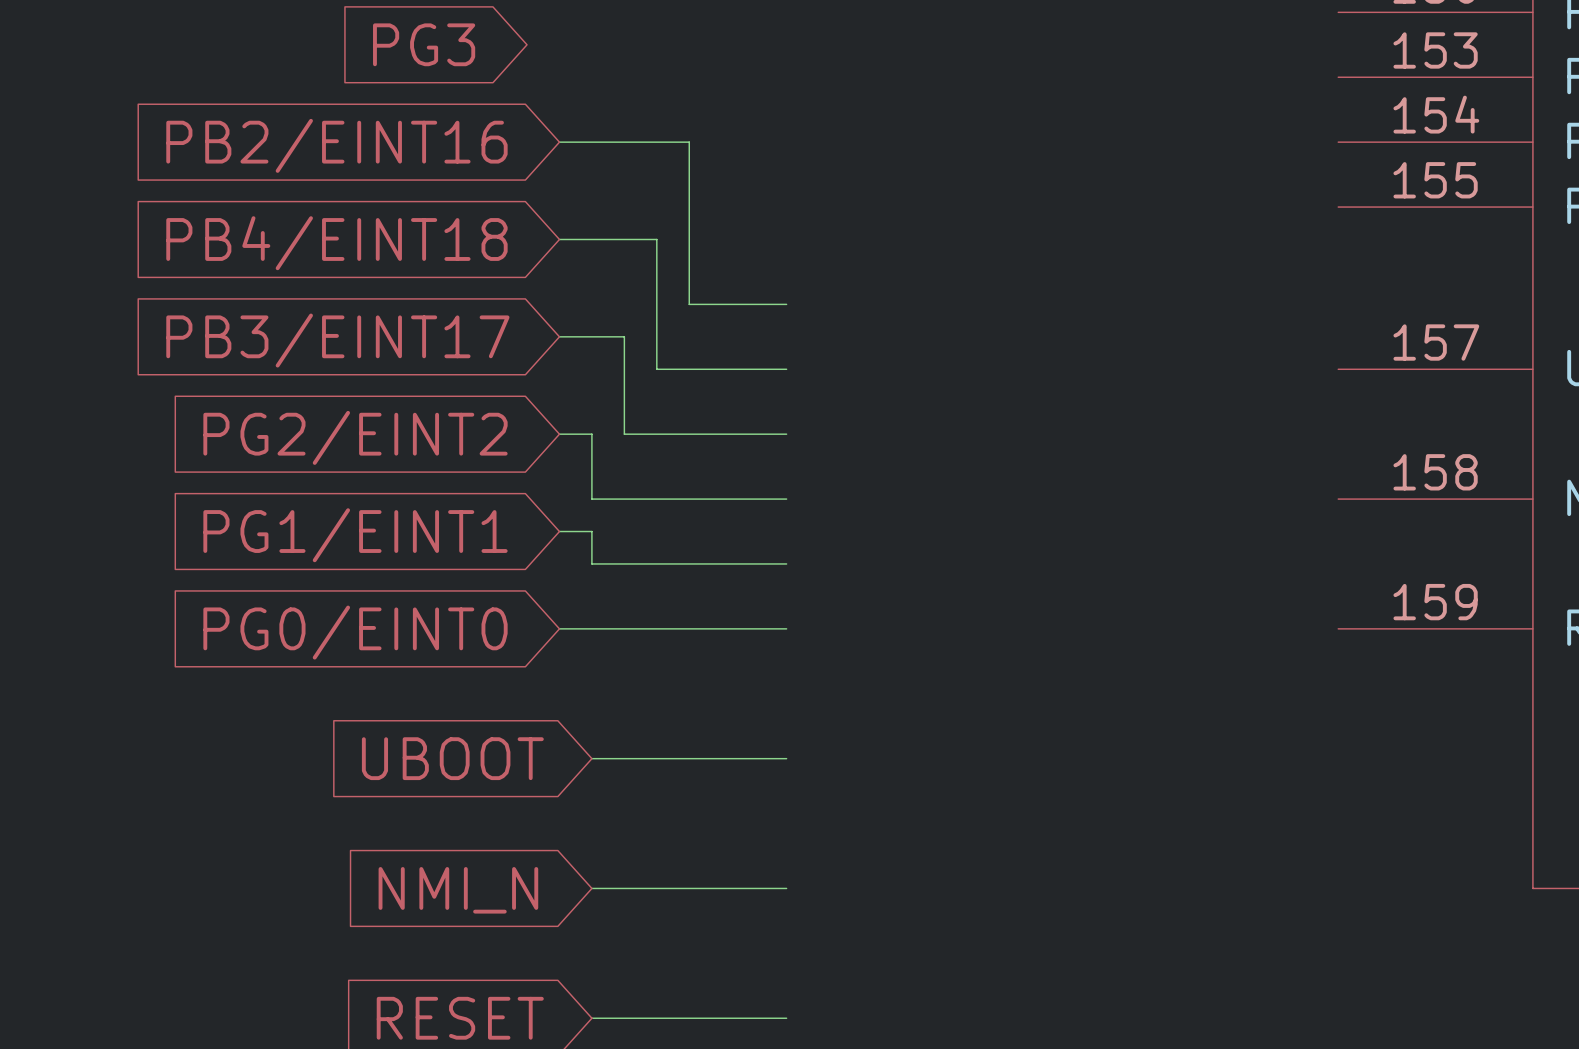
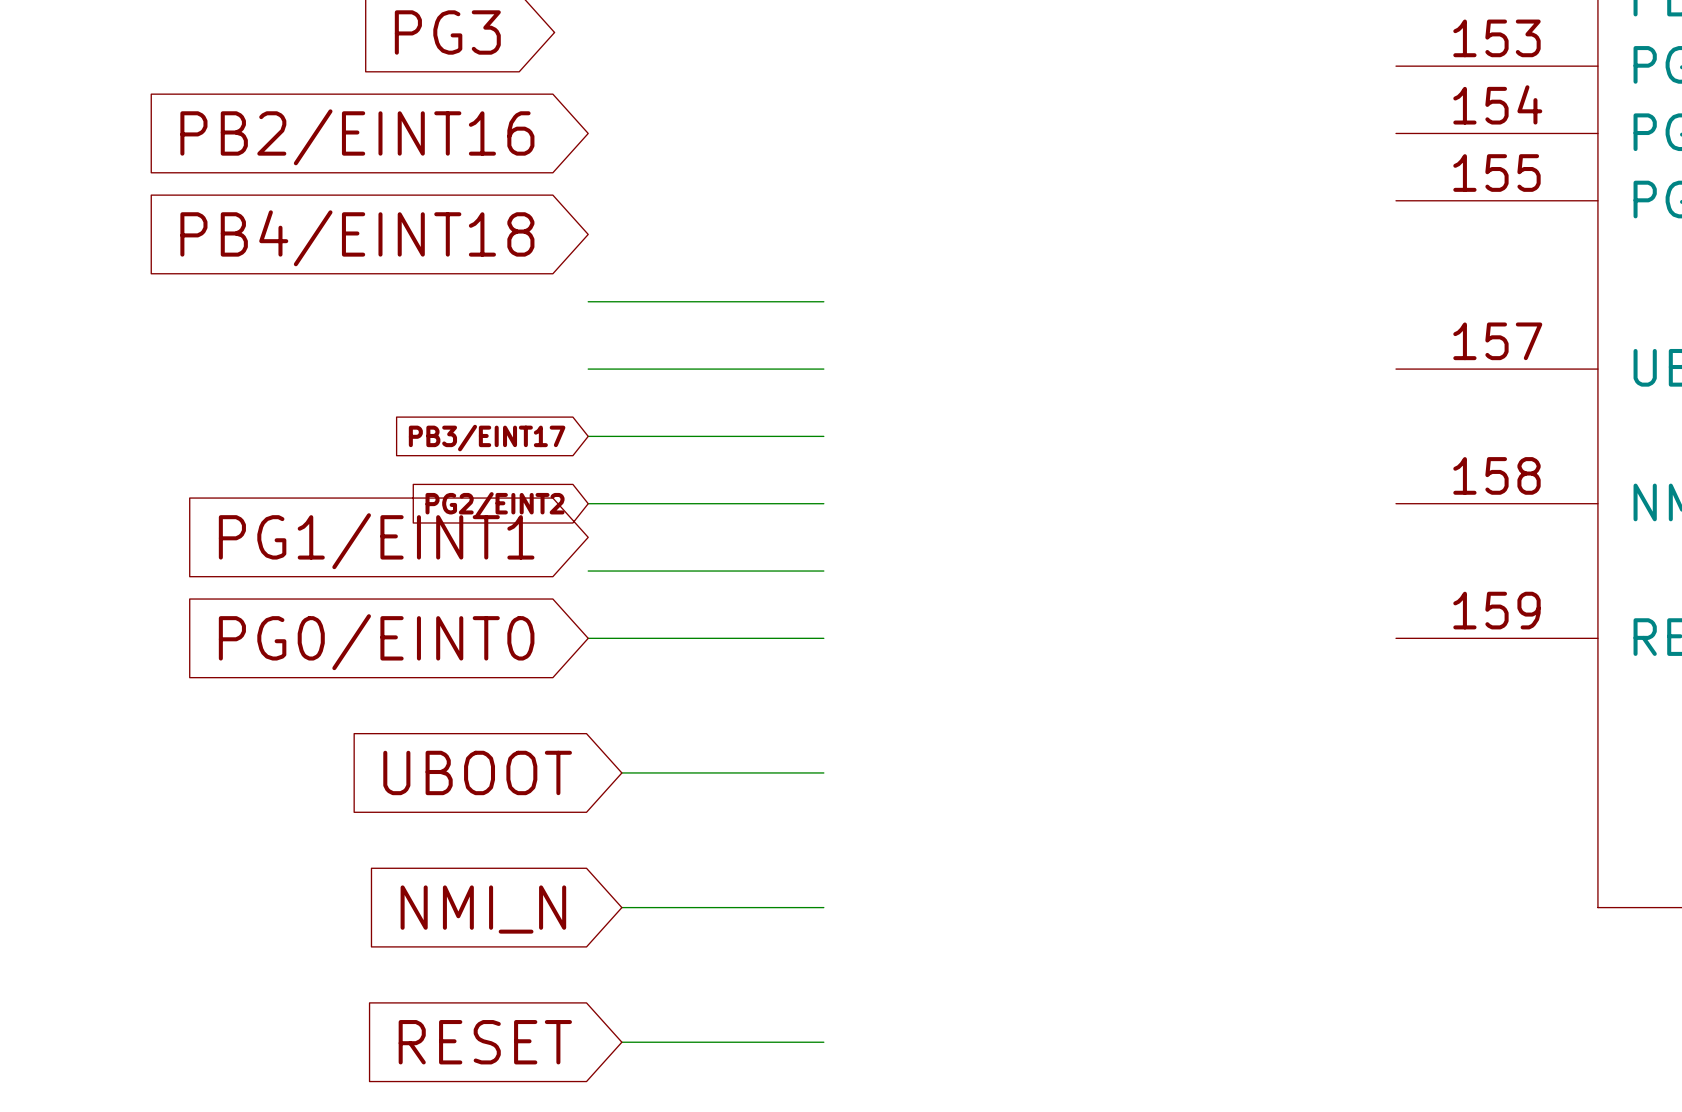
wire: (559, 142) (689, 142) (689, 304) -> (588, 301) (722, 301)
wire: (559, 239) (656, 239) (656, 369) -> (588, 369) (689, 369)
wire: (559, 336) (624, 336) (624, 434) -> none
global label: PB3/EINT17 (337, 340) -> none
wire: (591, 434) (591, 499) -> (621, 436) (655, 436)
global label: PG2/EINT2 (355, 437) -> PB3/EINT17 (487, 438)
wire: none -> (588, 503) (621, 503)
global label: none -> PG2/EINT2 (495, 505)
wire: (559, 531) (591, 531) (591, 563) -> (588, 571) (621, 571)

